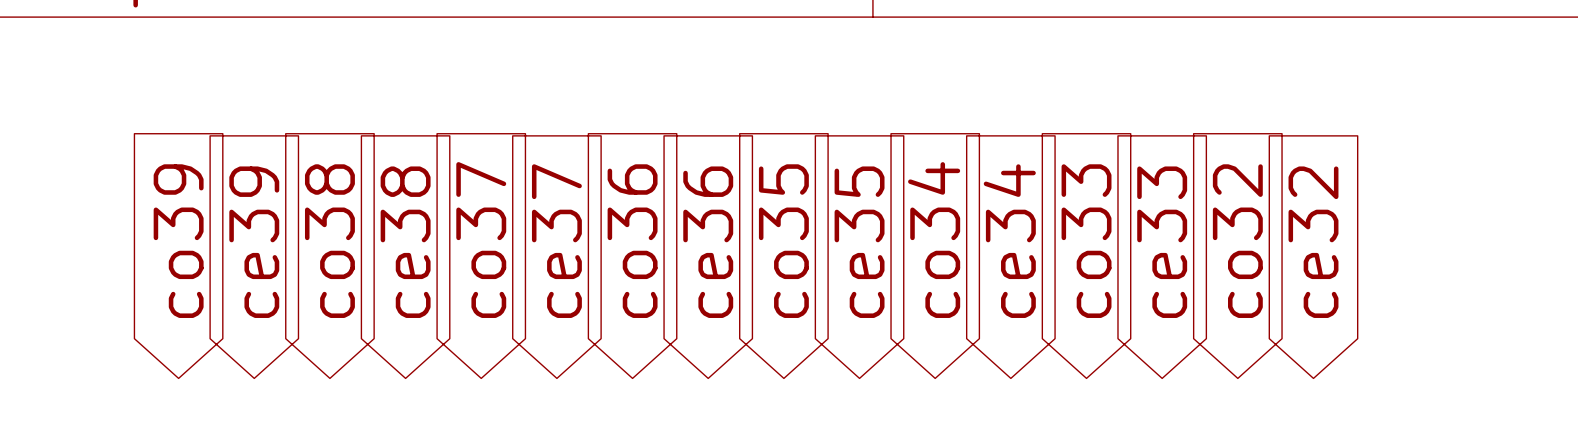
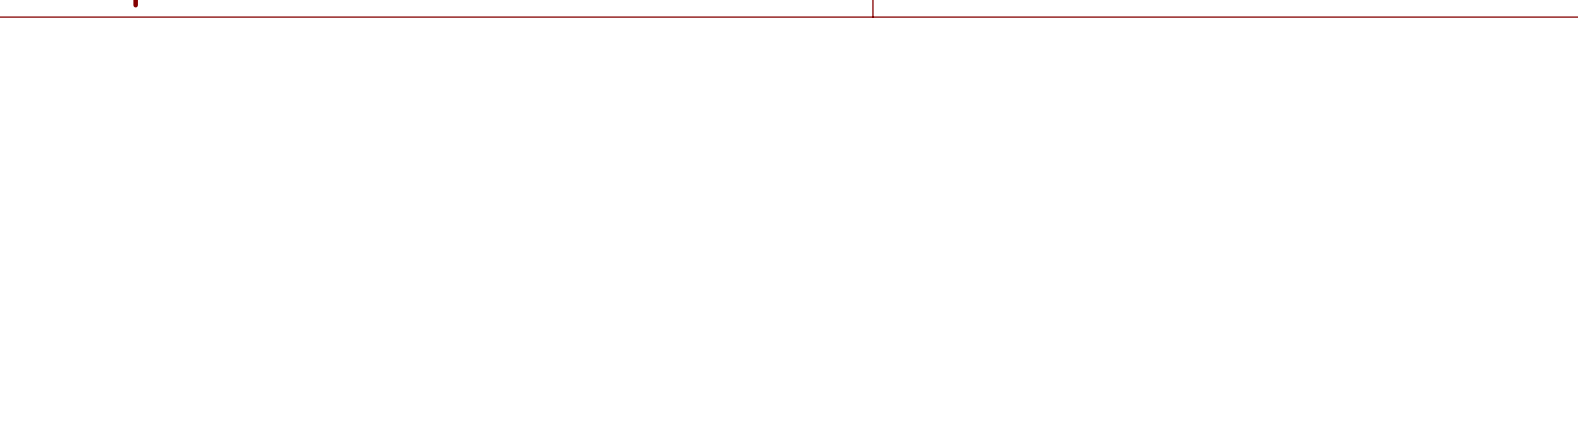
global label: co37 (481, 240) -> none
global label: co34 (934, 240) -> none
global label: co39 (178, 241) -> none
global label: co38 (329, 241) -> none
global label: ce37 (556, 241) -> none
global label: co36 (632, 241) -> none
global label: co35 (783, 241) -> none
global label: ce34 (1009, 241) -> none
global label: co33 (1086, 241) -> none
global label: co32 (1237, 241) -> none
global label: ce39 (254, 242) -> none
global label: ce38 (405, 242) -> none
global label: ce36 (708, 242) -> none
global label: ce35 (859, 242) -> none
global label: ce33 (1162, 242) -> none
global label: ce32 (1313, 242) -> none

